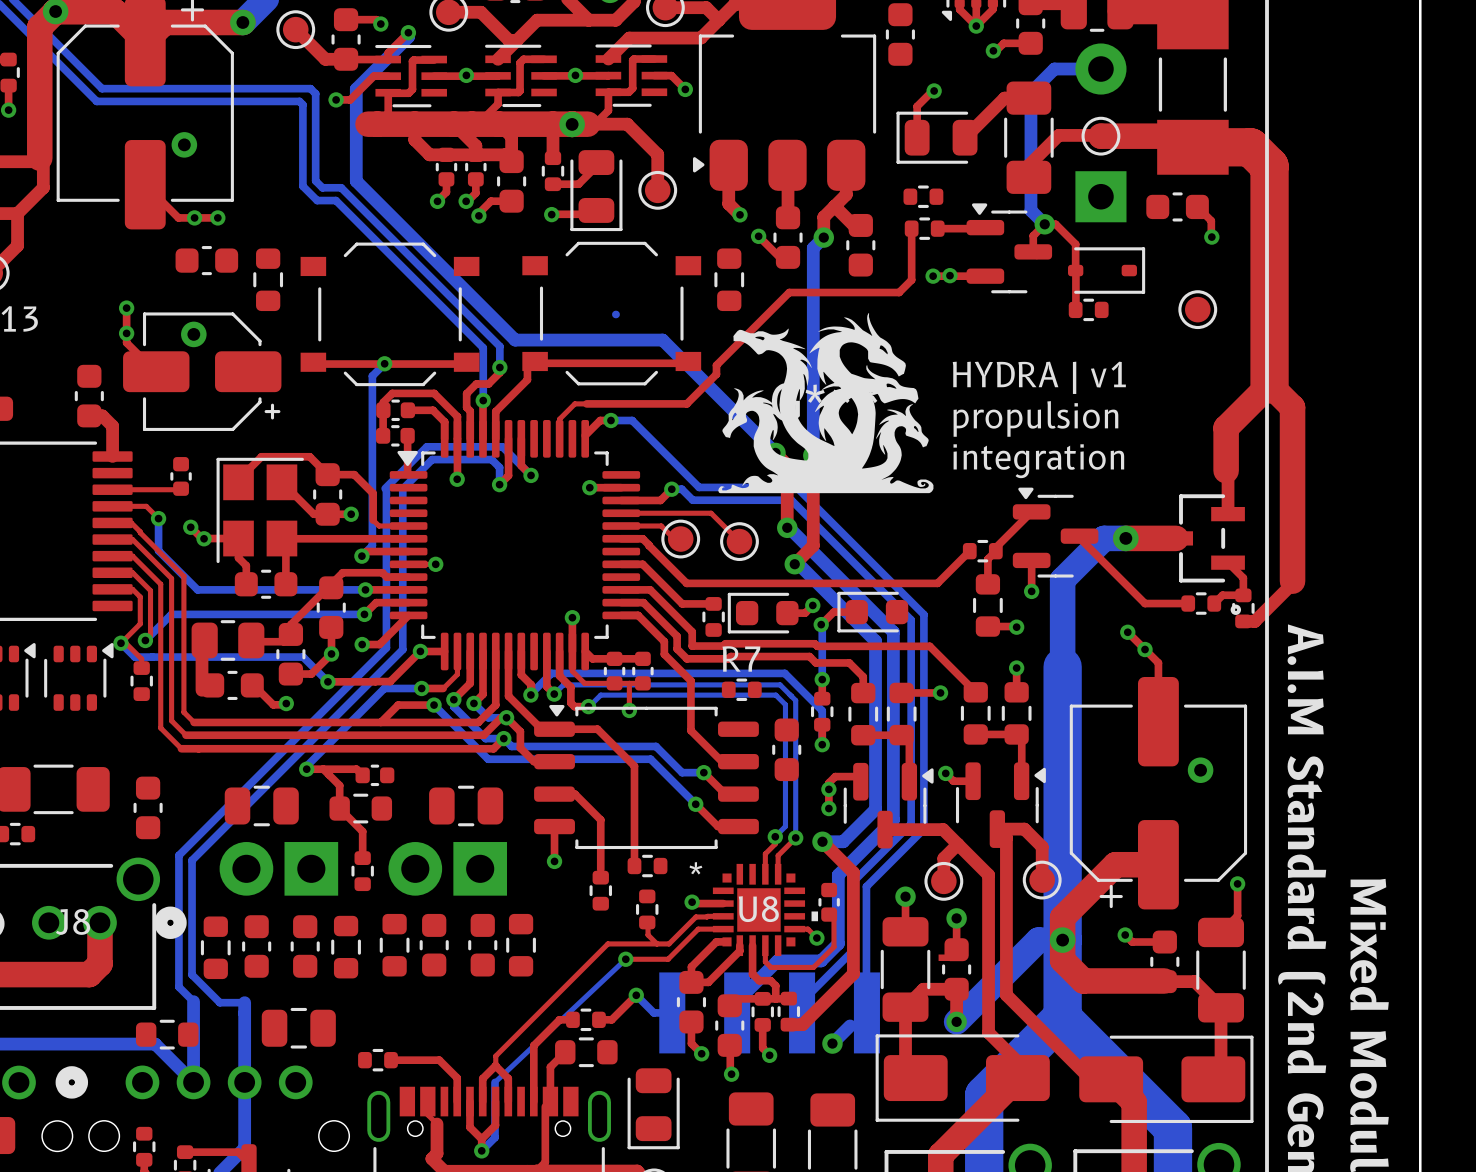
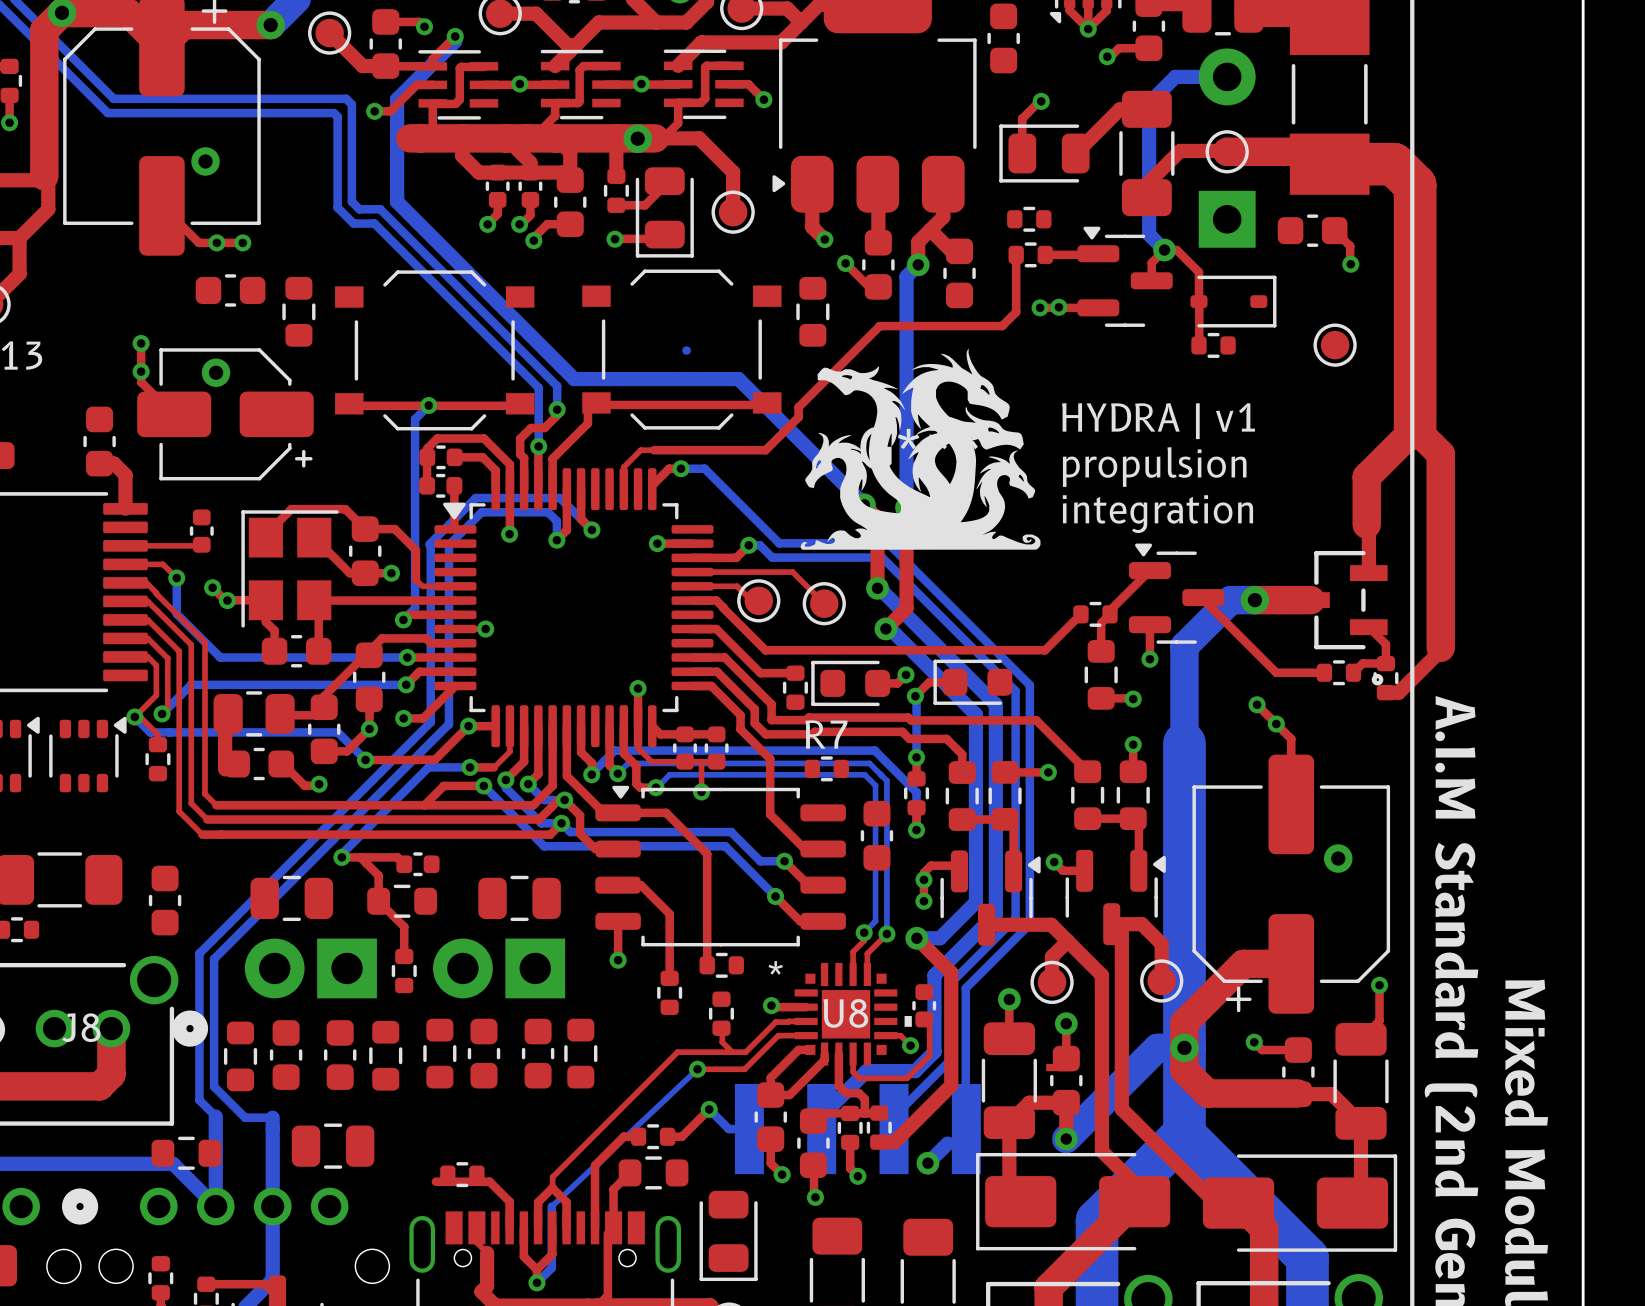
part position: (378, 1060) -> (462, 1174)

